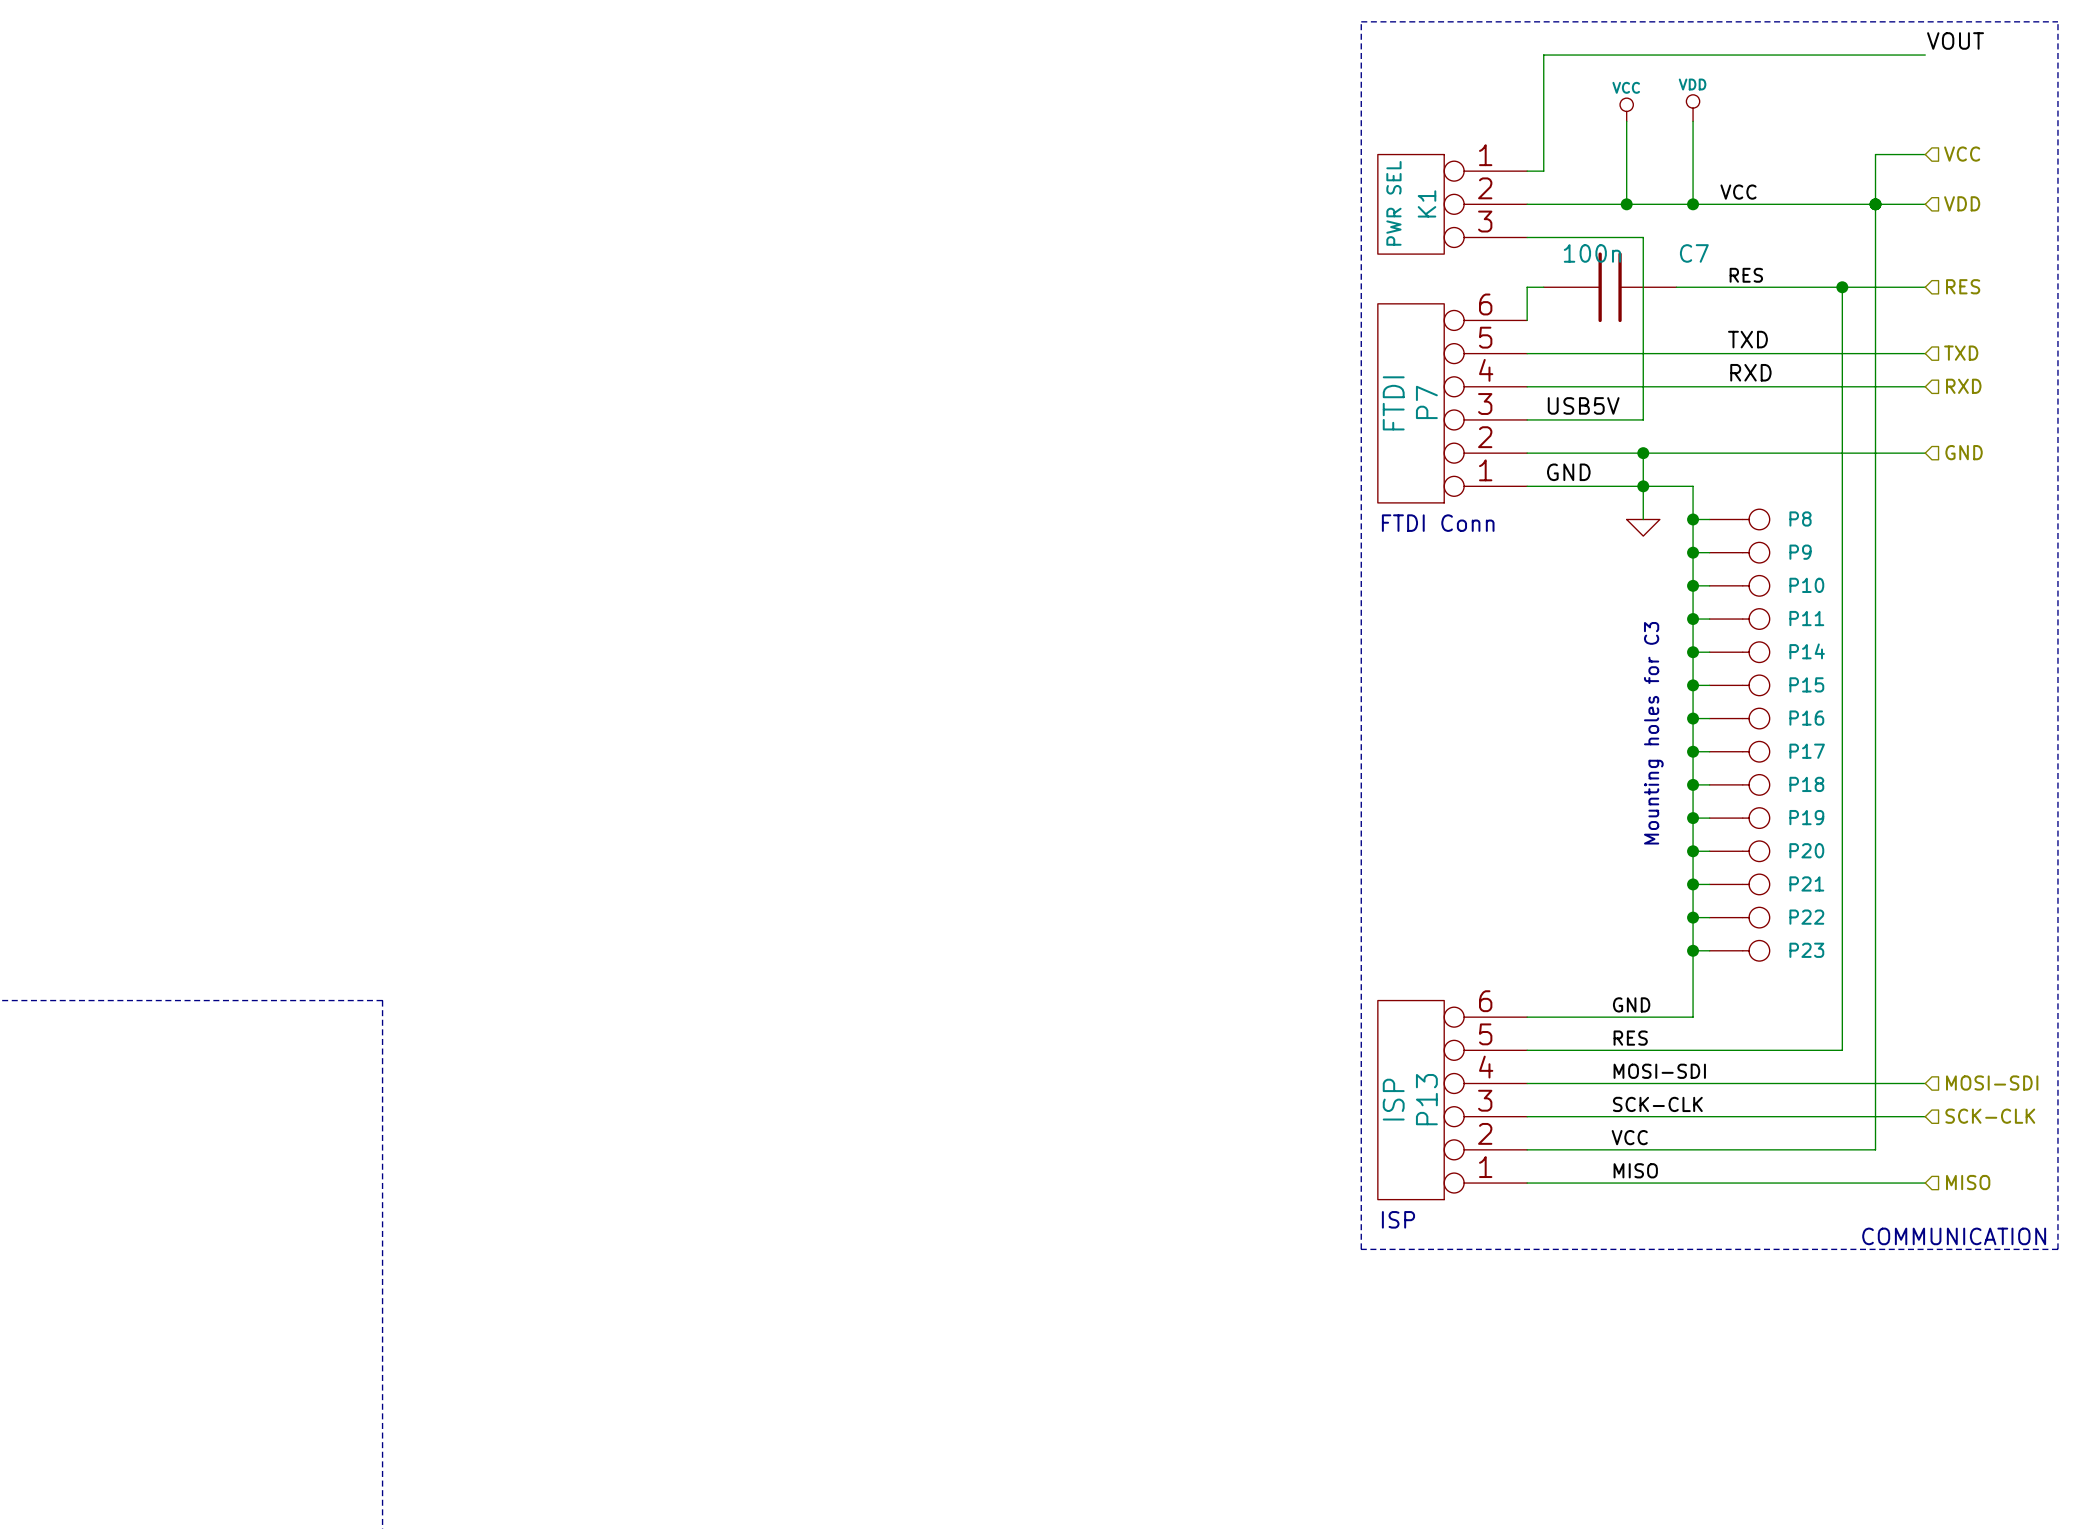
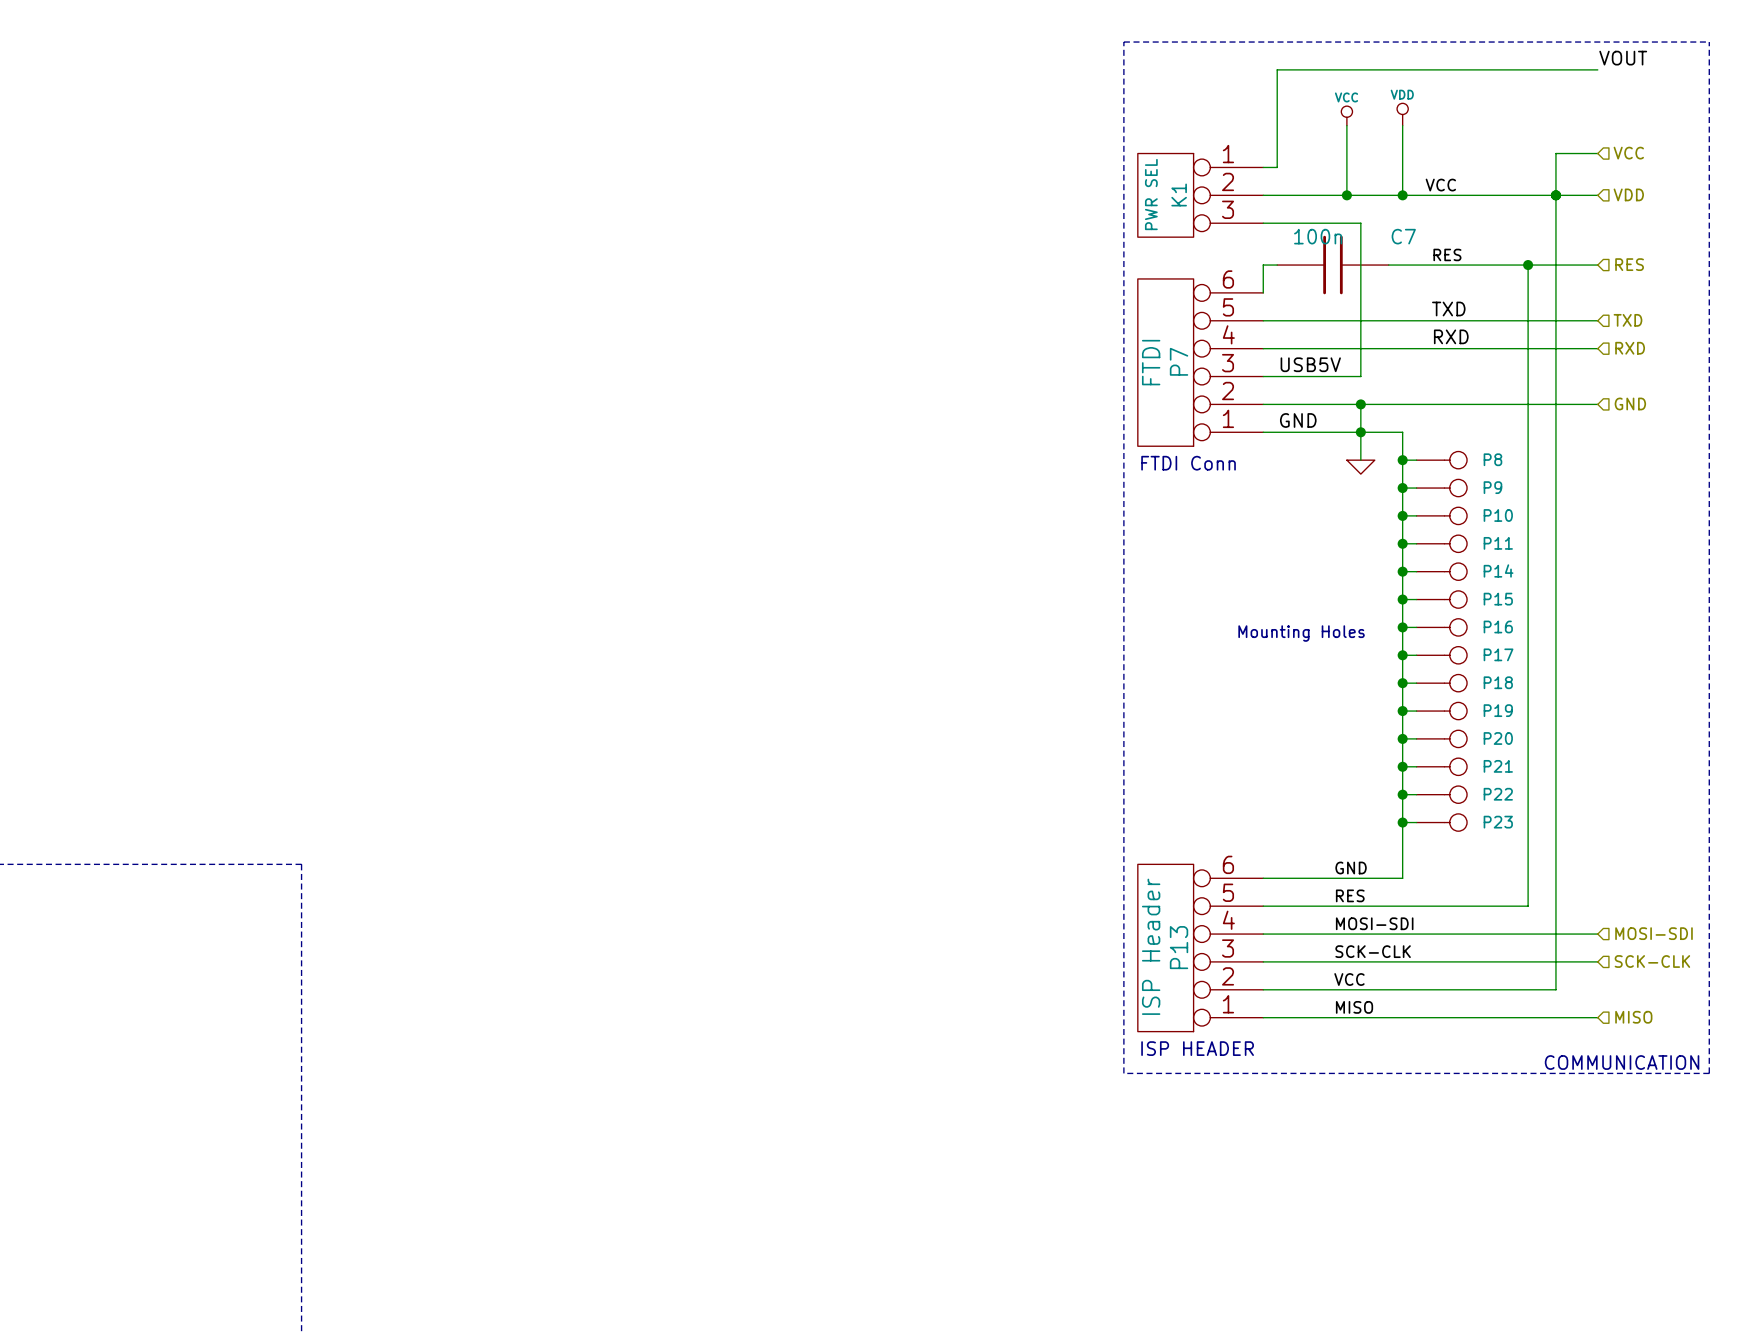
text: Mounting holes for C3 (1653, 733) -> Mounting Holes (1301, 633)
P13 value: ISP (1393, 1099) -> ISP Header (1151, 946)
text: ISP (1398, 1219) -> ISP HEADER (1197, 1048)

